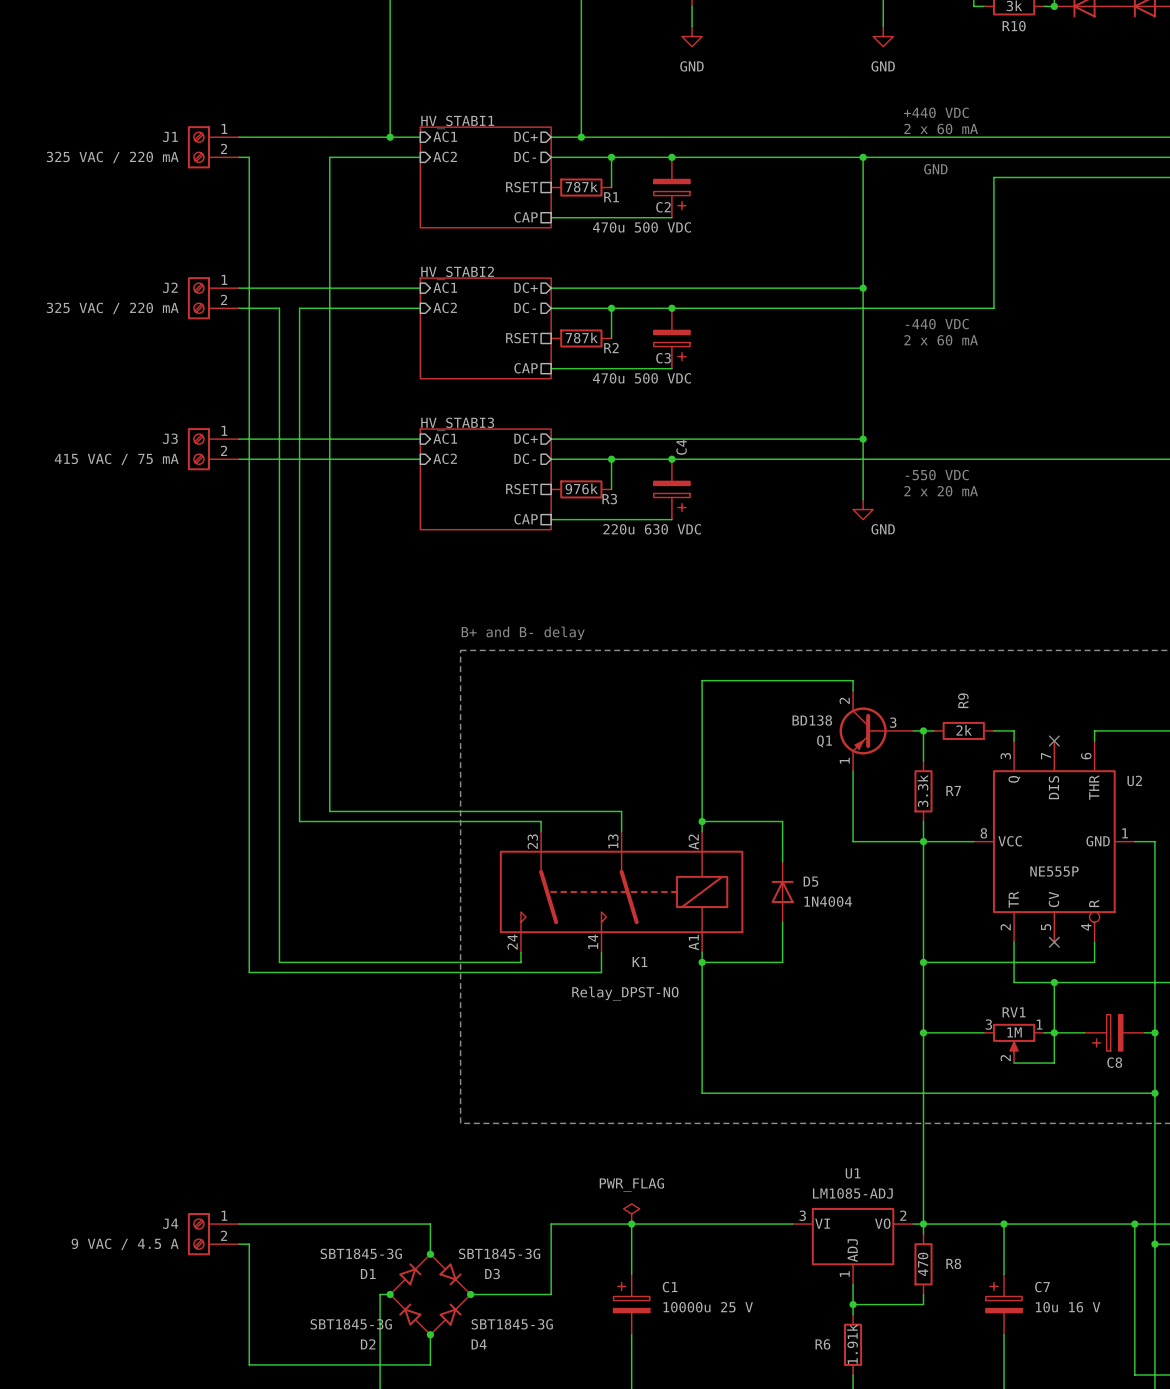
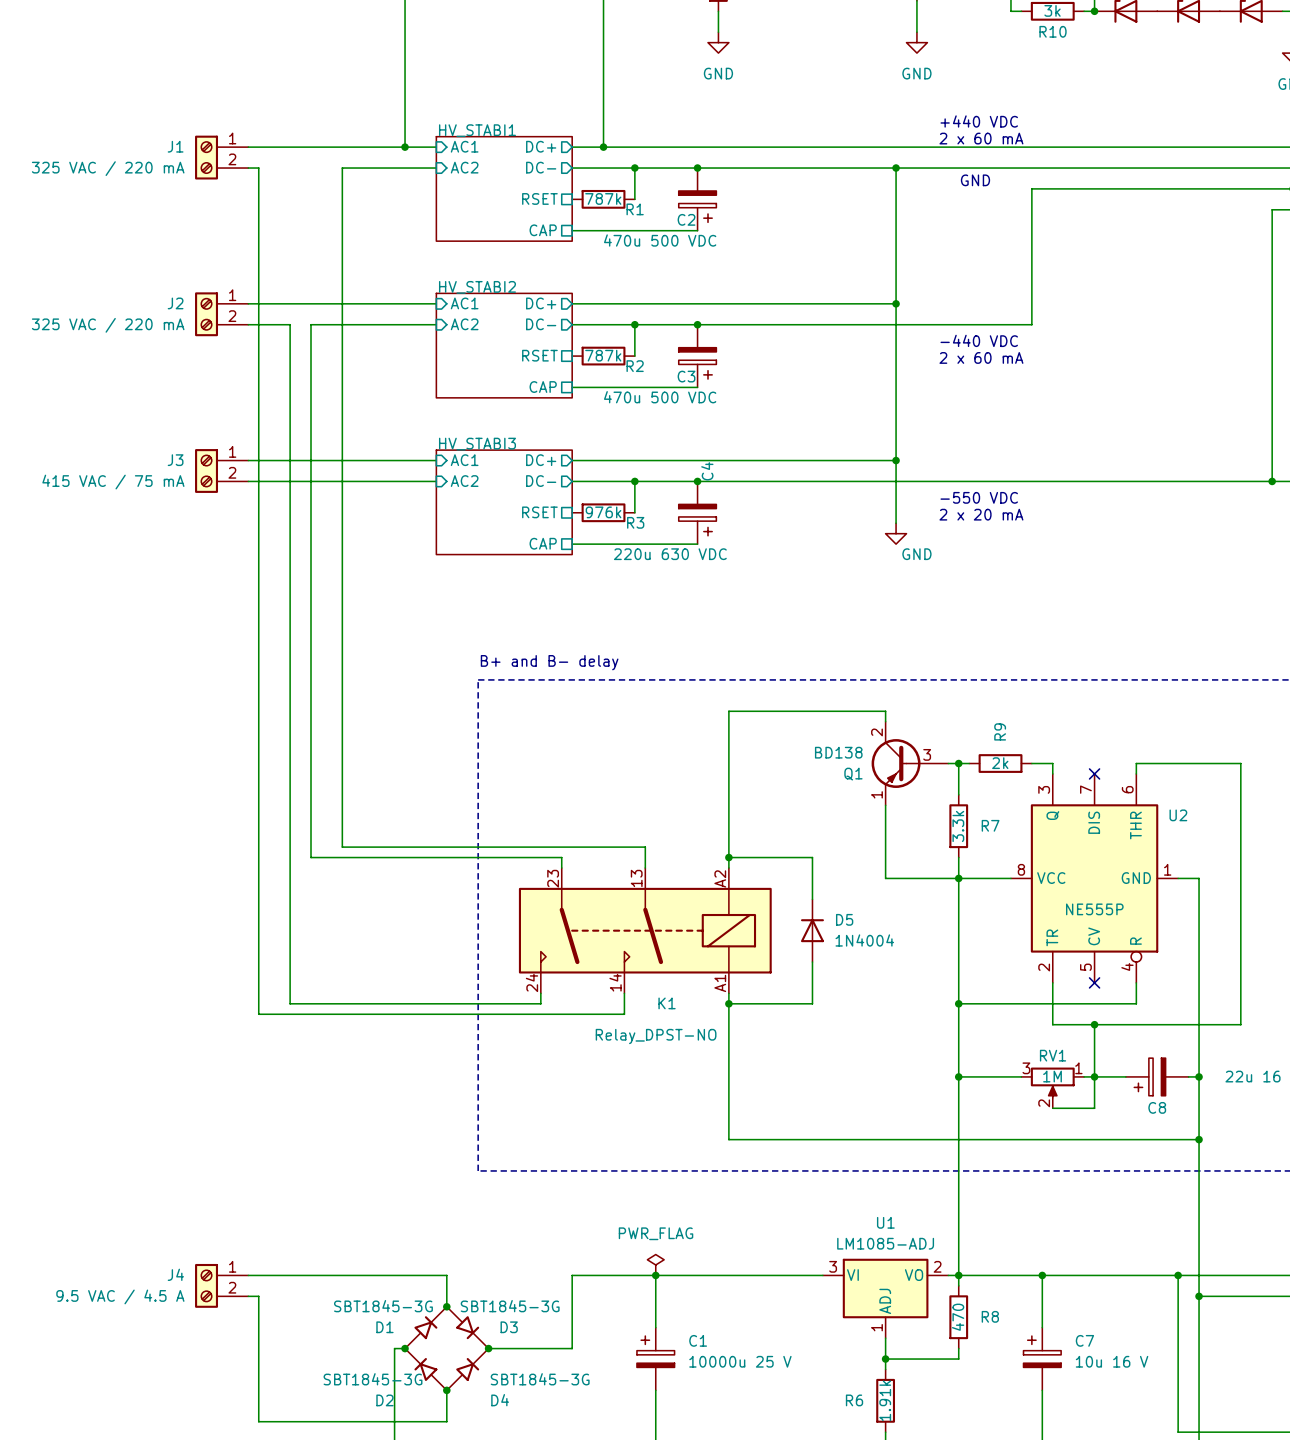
J4 value: 9 VAC / 4.5 A (125, 1244) -> 9.5 VAC / 4.5 A (120, 1296)

